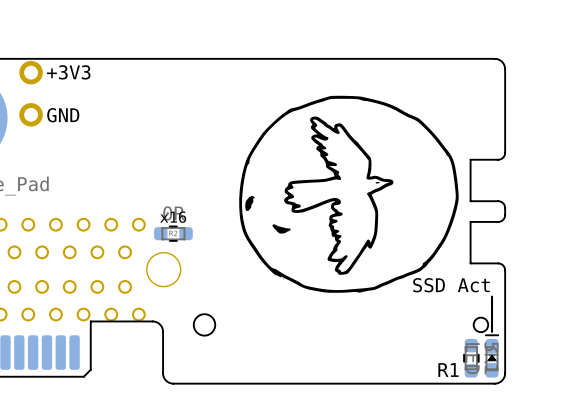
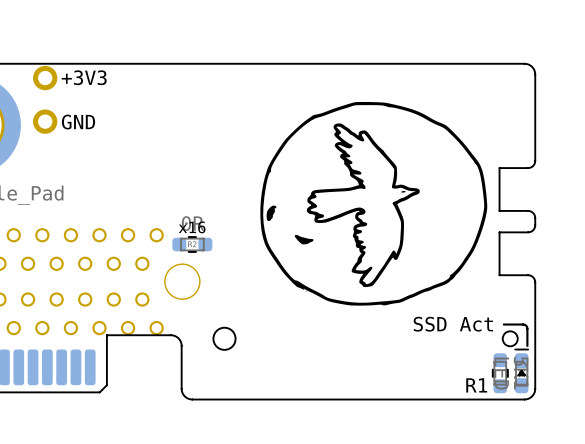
text position: SSD Act (451, 285) -> SSD Act (453, 324)
line: (492, 296) (492, 331) -> none
line: none -> (503, 324) (526, 325) (527, 345)

